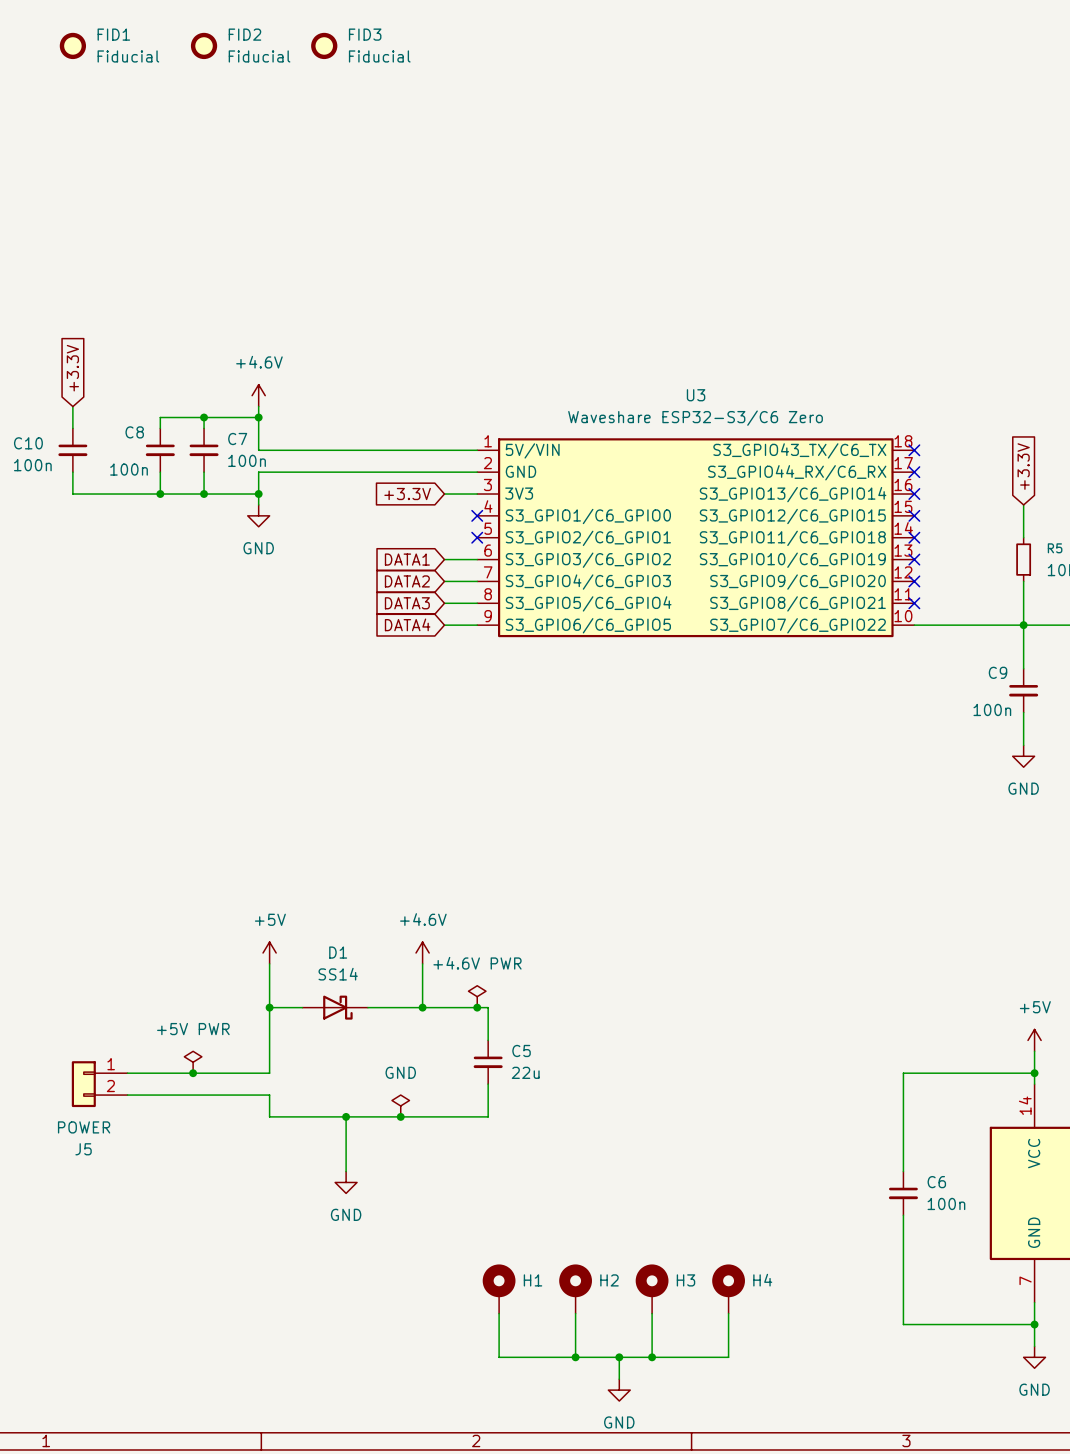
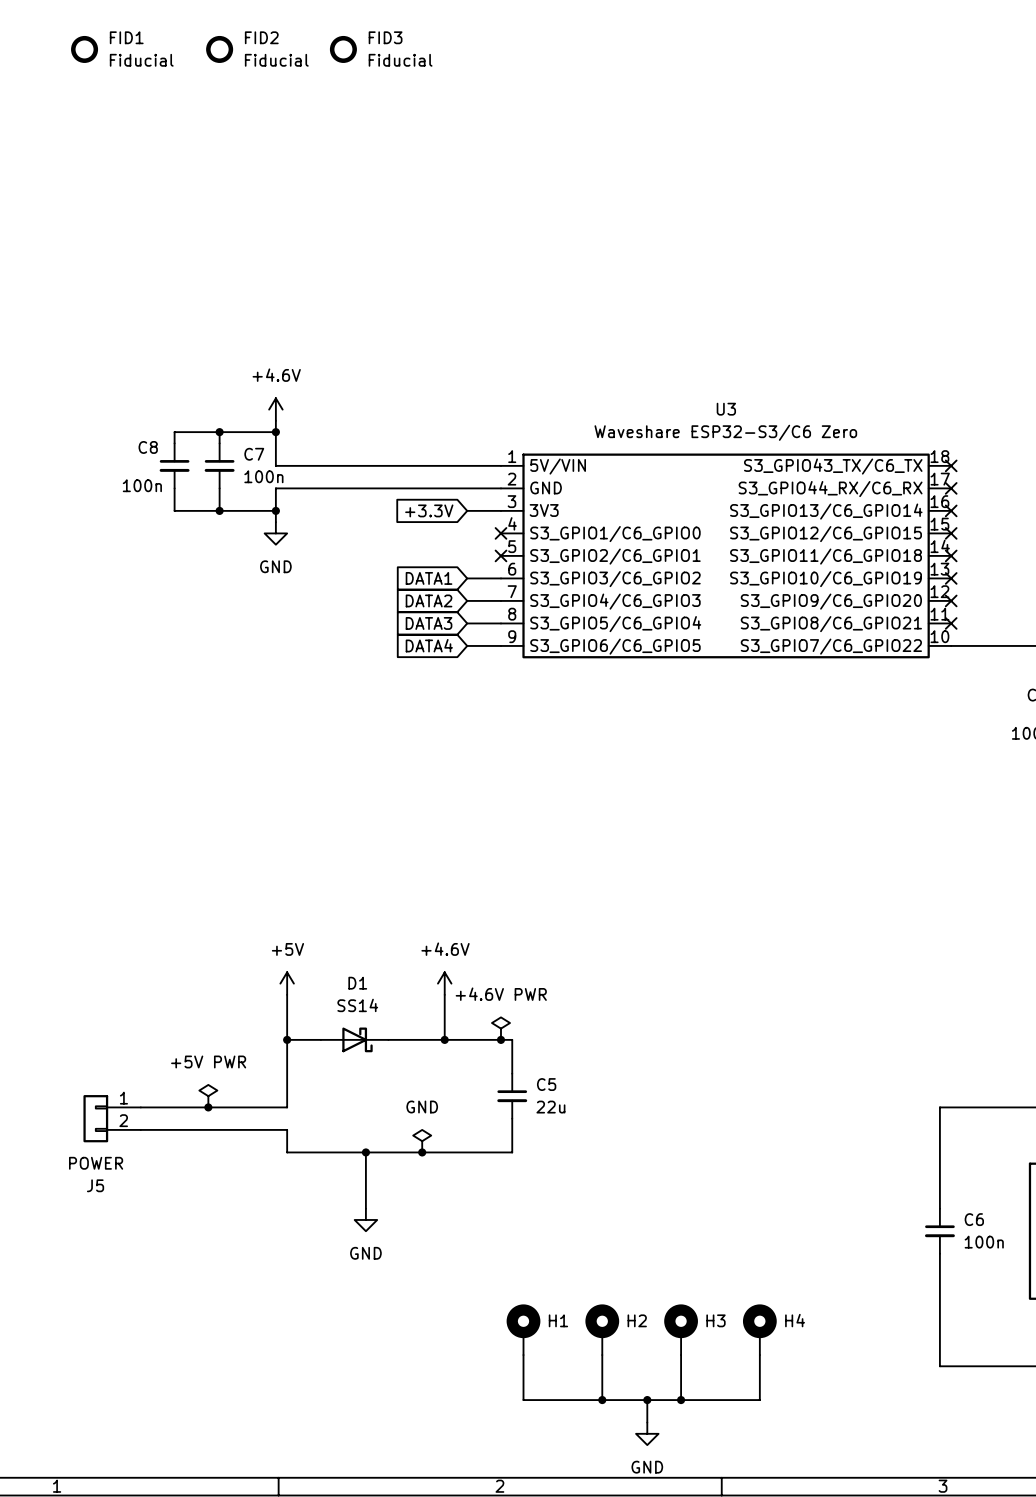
global label: +3.3V (72, 368) -> none
wire: (72, 406) (72, 428) -> none
C10: 100n (72, 450) -> none
wire: (72, 472) (72, 494) (160, 494) -> none
junction: (160, 494) -> none

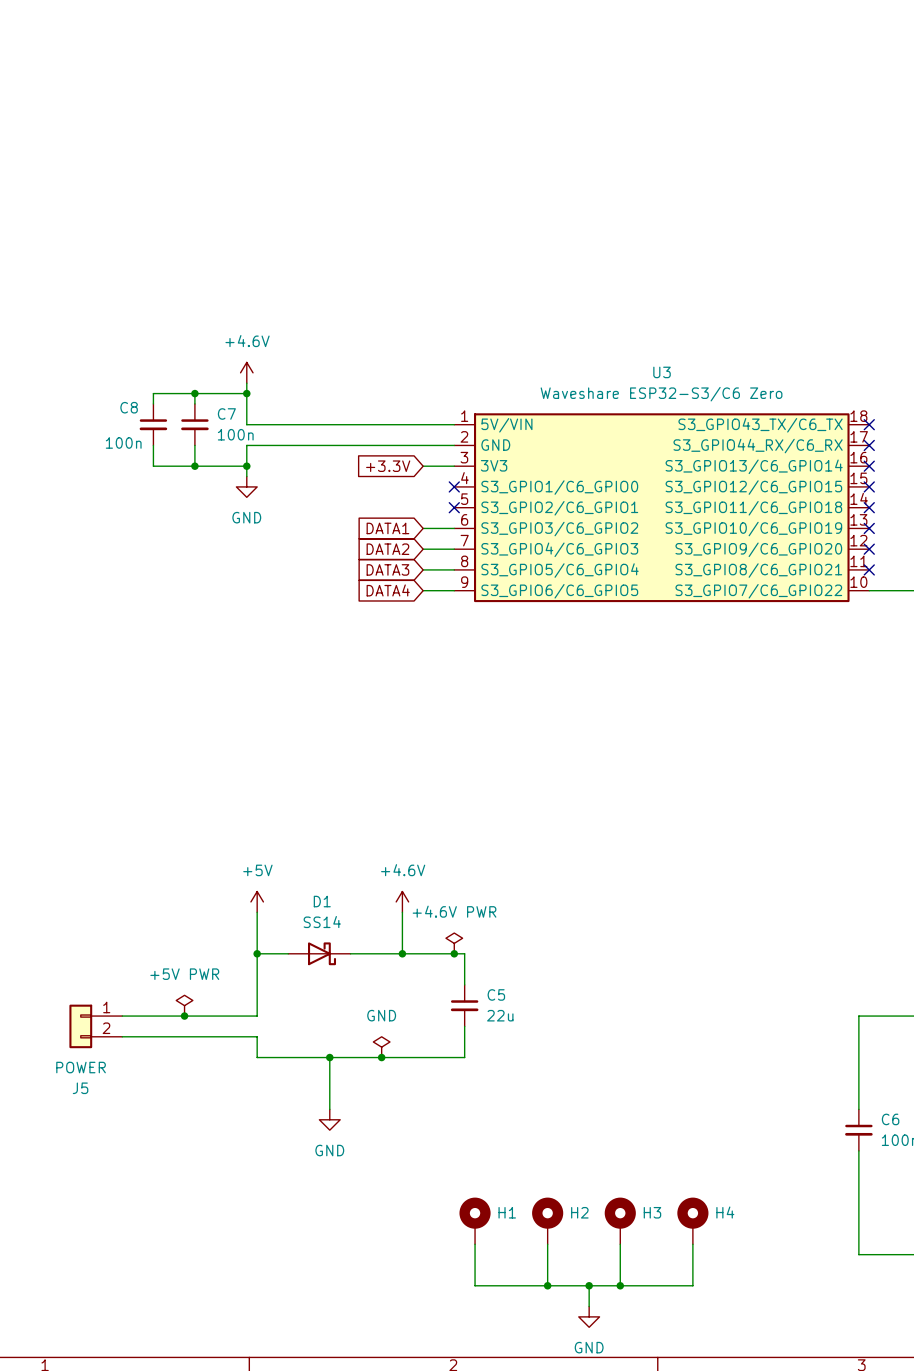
FID1: Fiducial (84, 49) -> none
FID2: Fiducial (219, 49) -> none
FID3: Fiducial (343, 49) -> none

